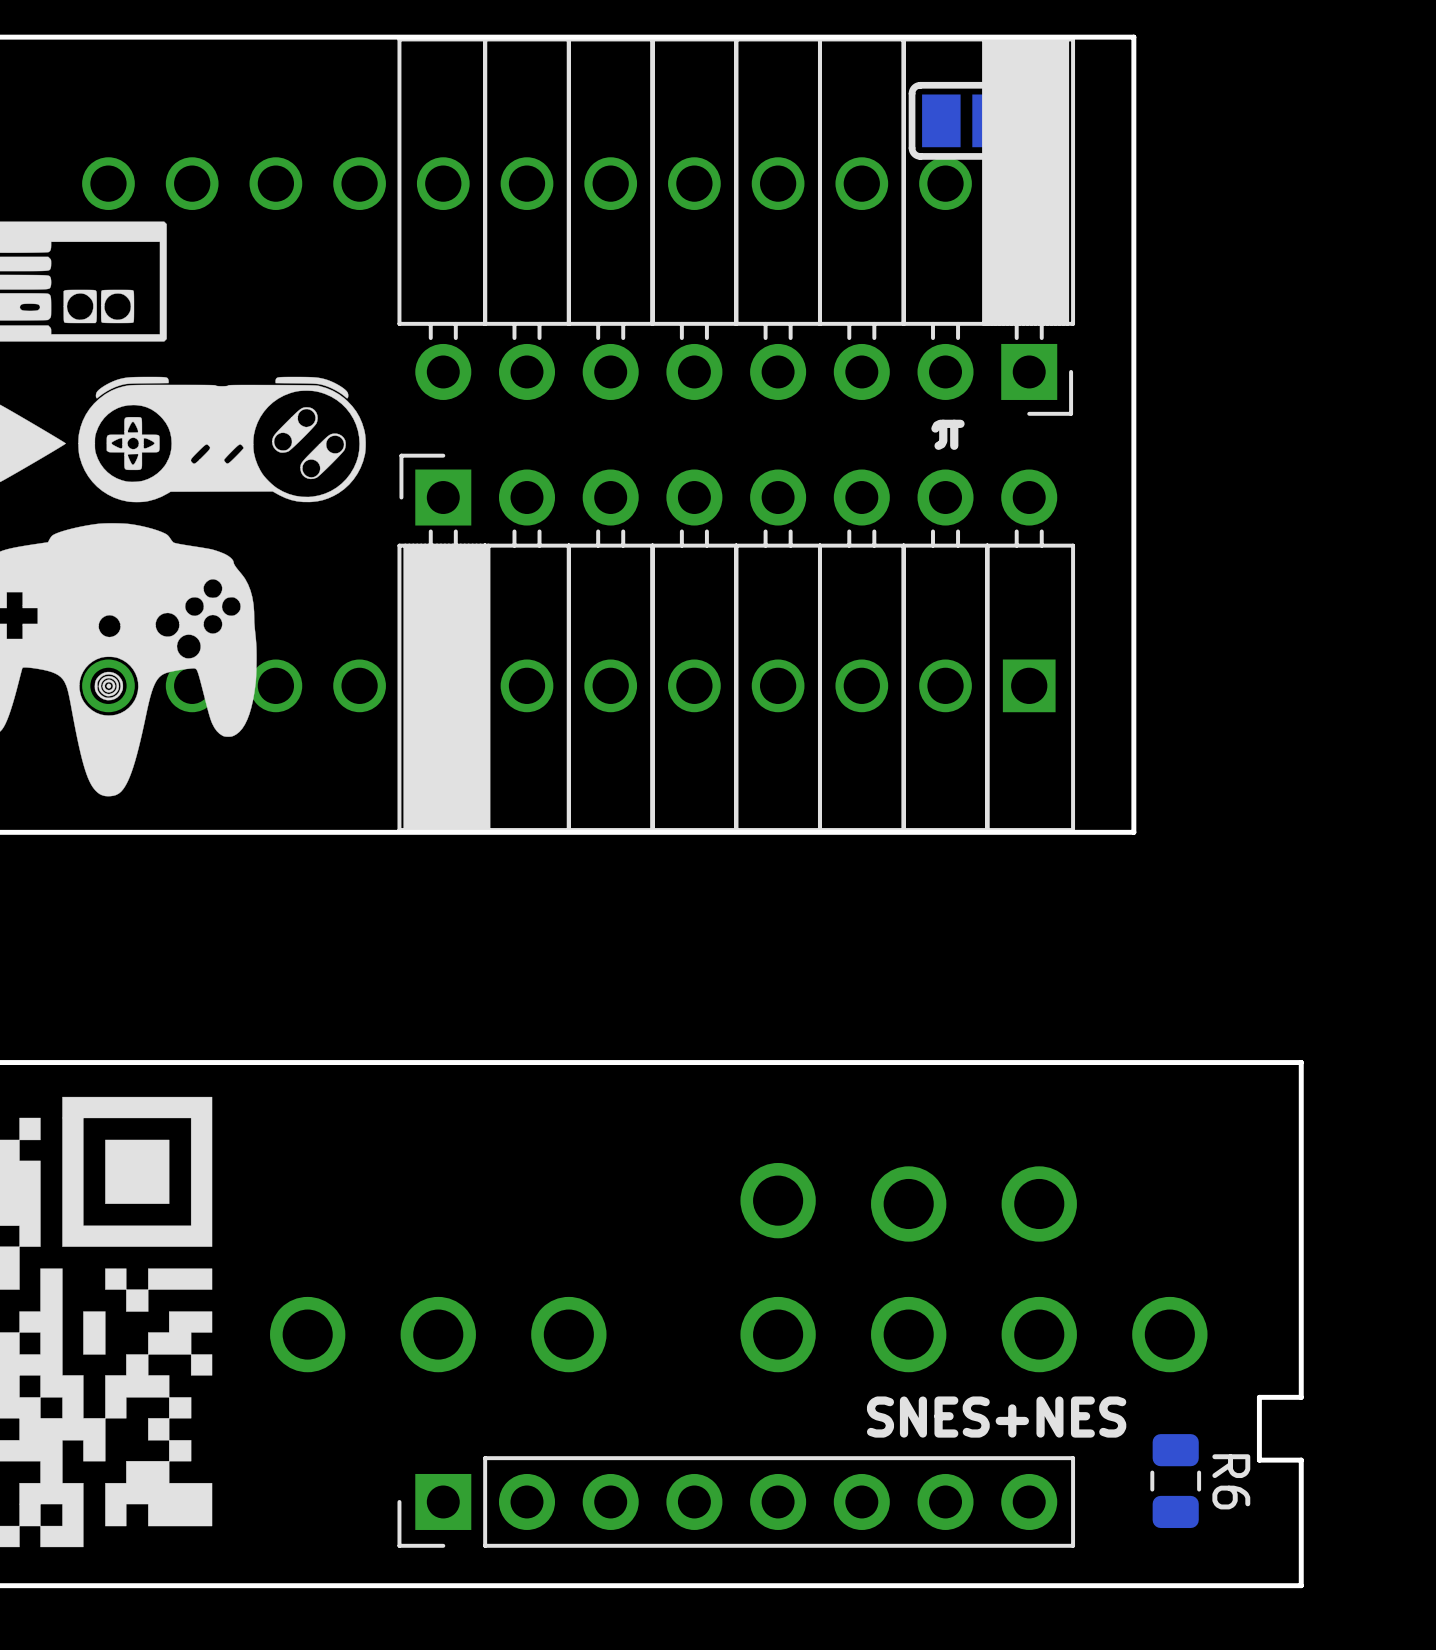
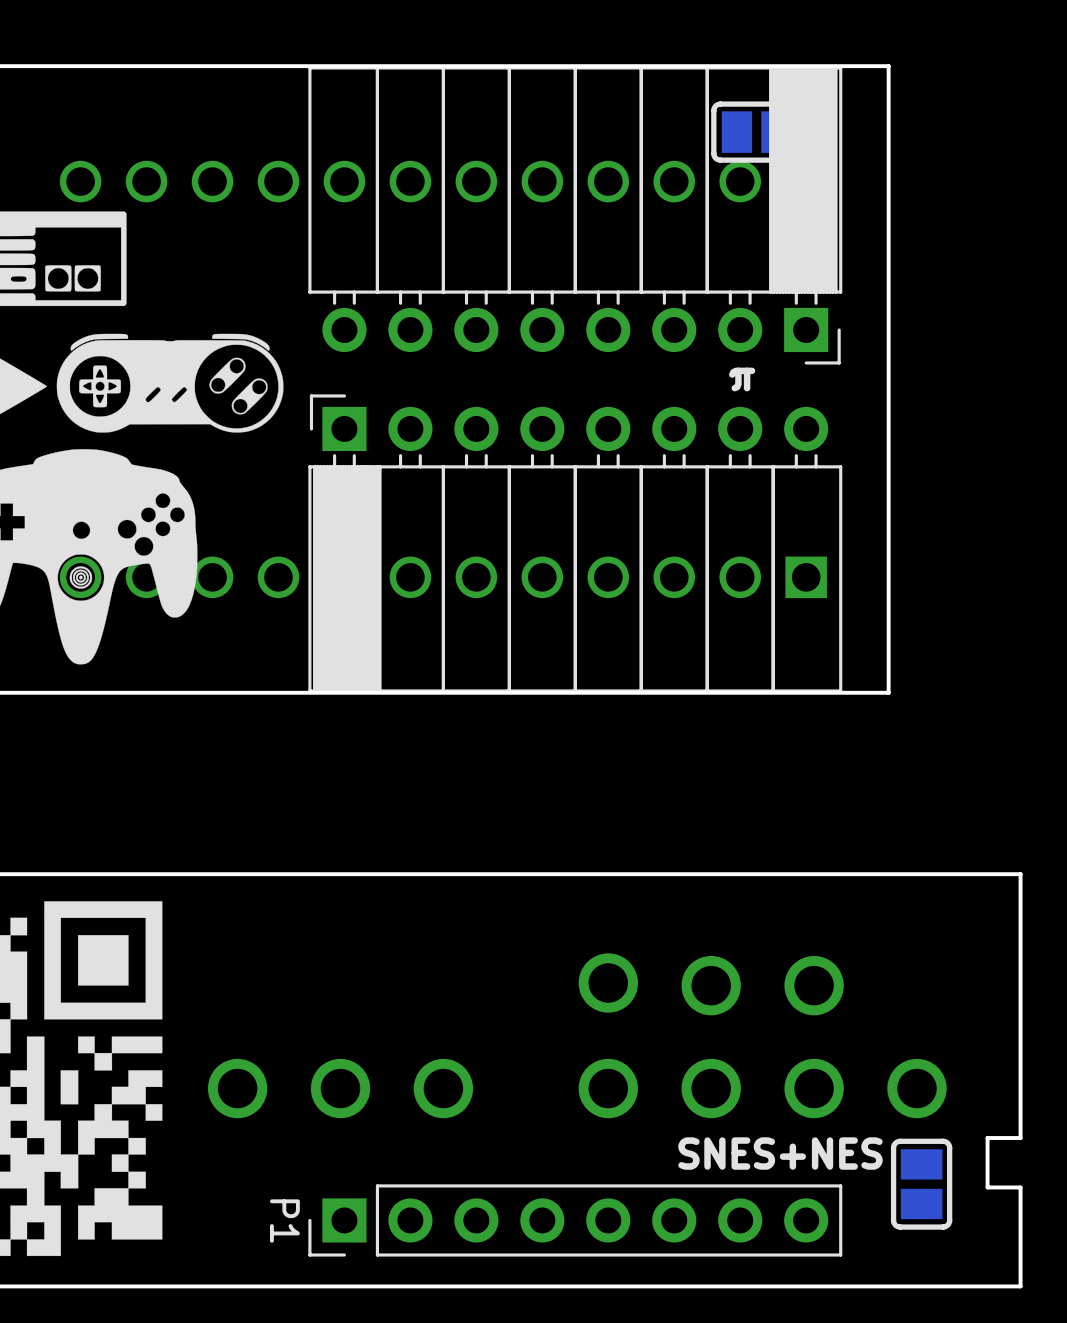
part: none -> (921, 1184)
R6: (1175, 1481) -> none
P1 name: none -> P1 (284, 1221)

